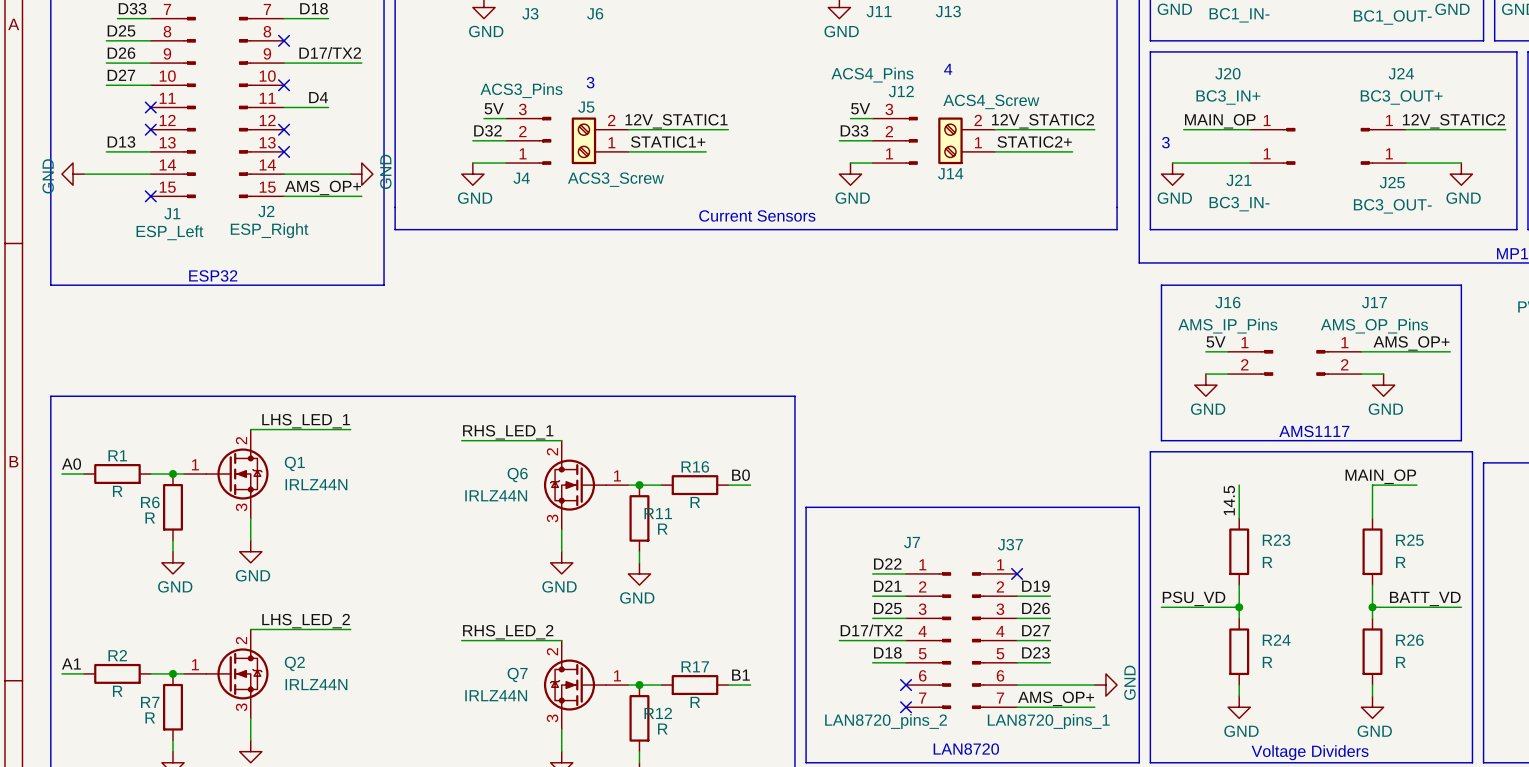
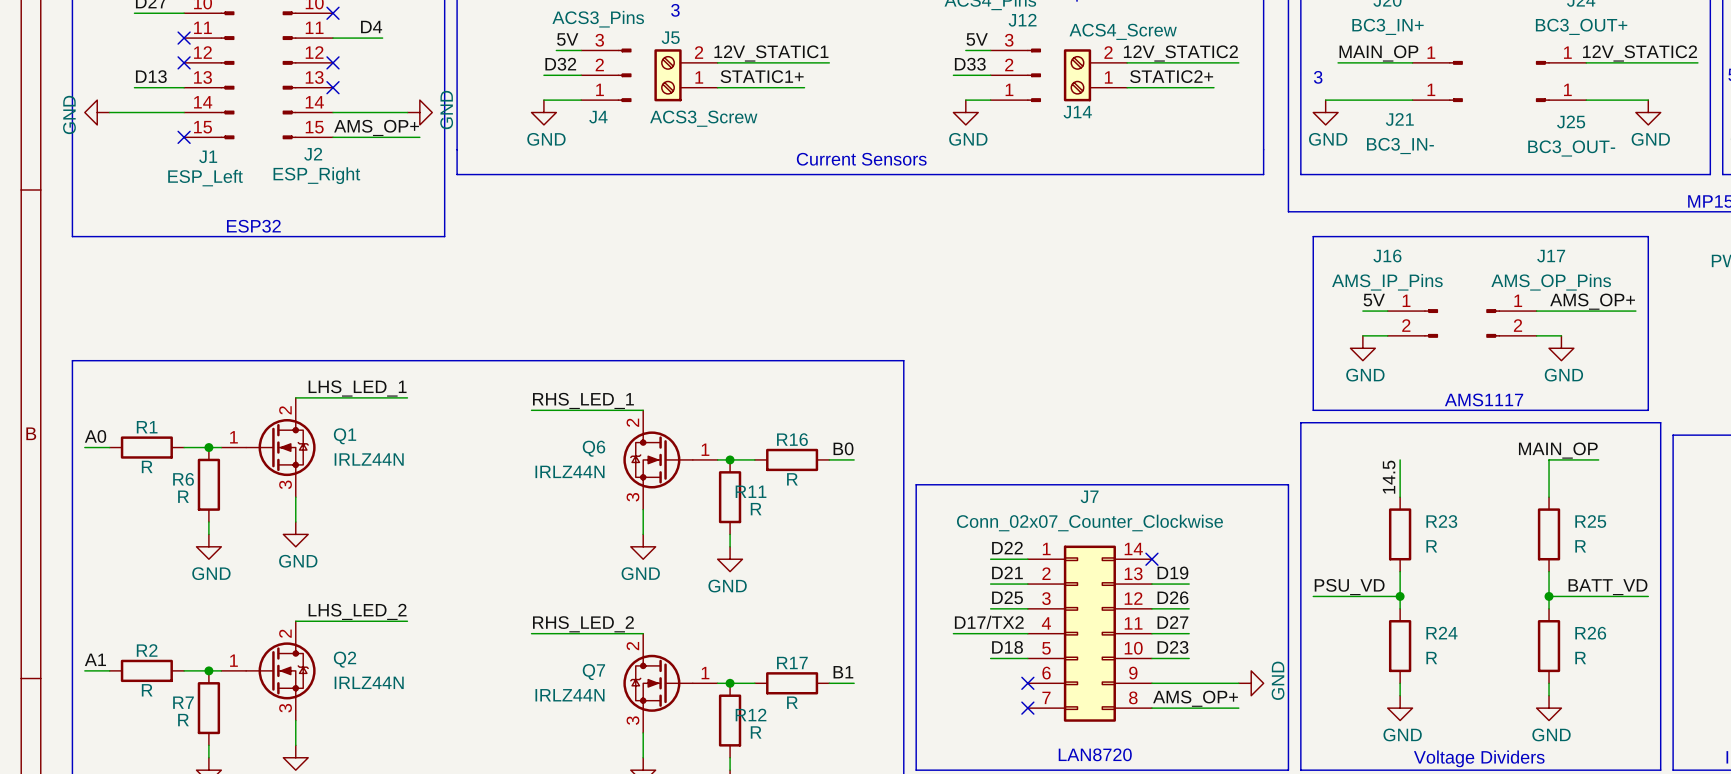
J7 name position: J7 (912, 542) -> J7 (1089, 496)
J7 symbol: [906, 572, 952, 710] -> [1027, 545, 1152, 722]
J37: LAN8720_pins_1 (994, 640) -> none
J7 value: LAN8720_pins_2 (886, 721) -> Conn_02x07_Counter_Clockwise (1089, 522)

